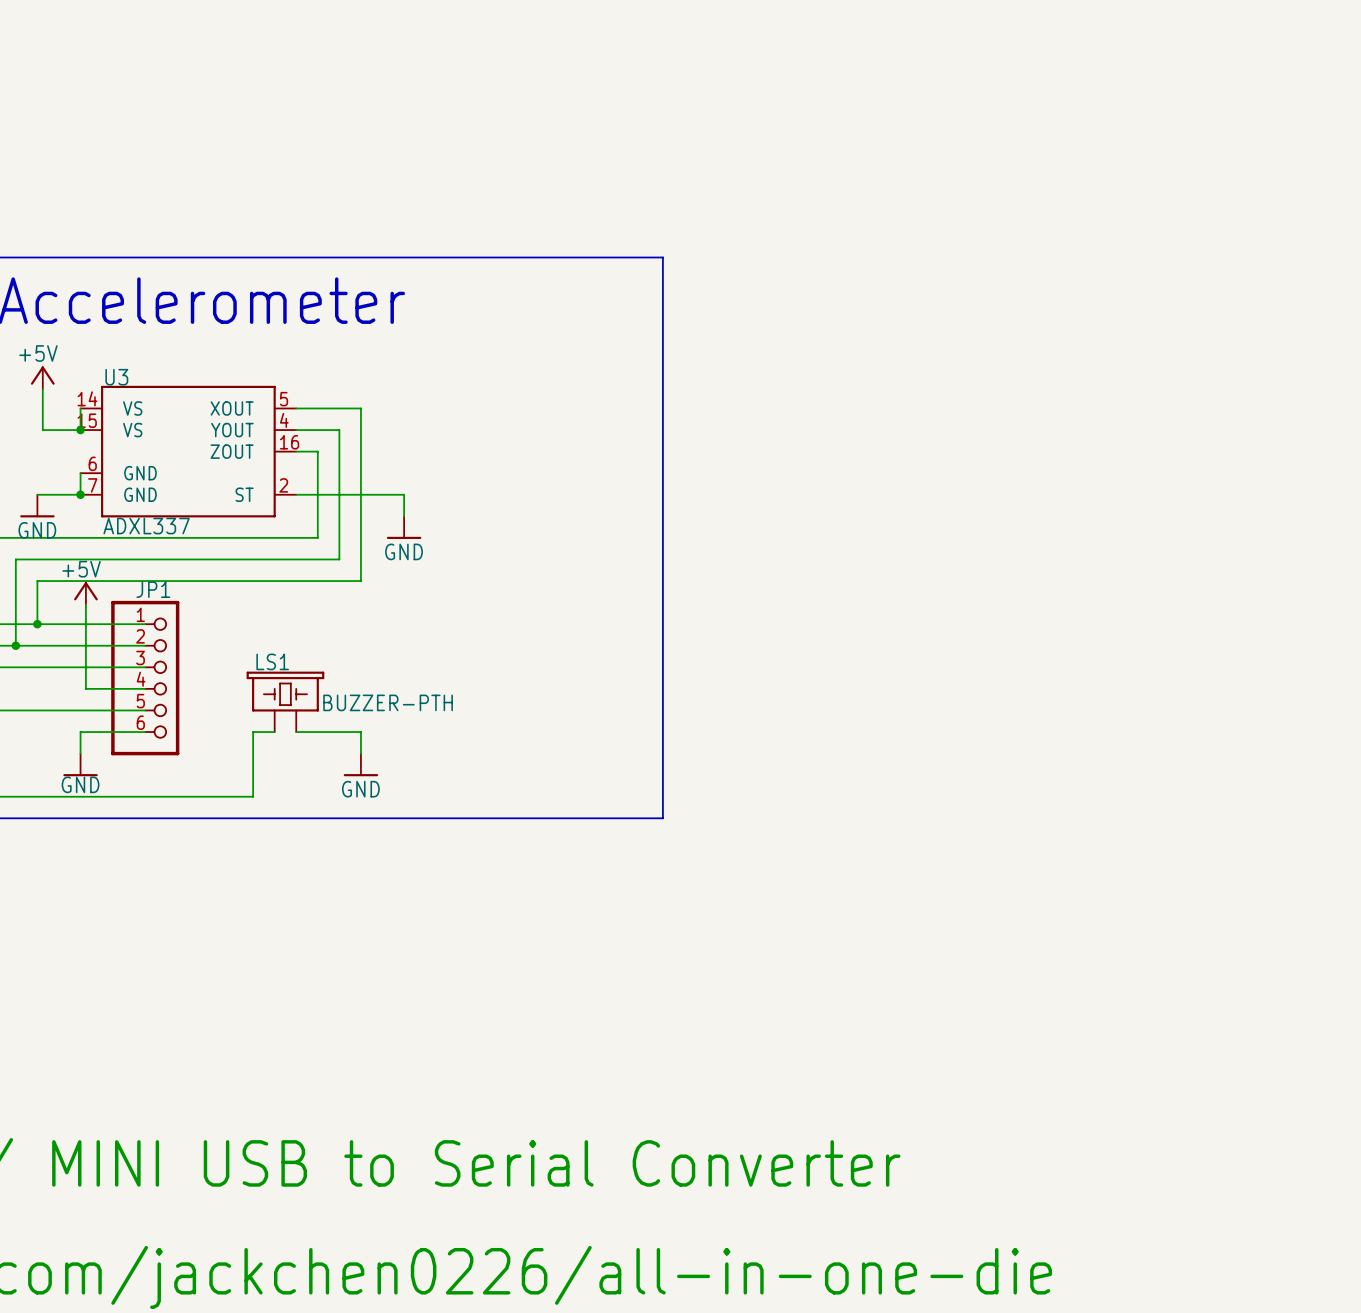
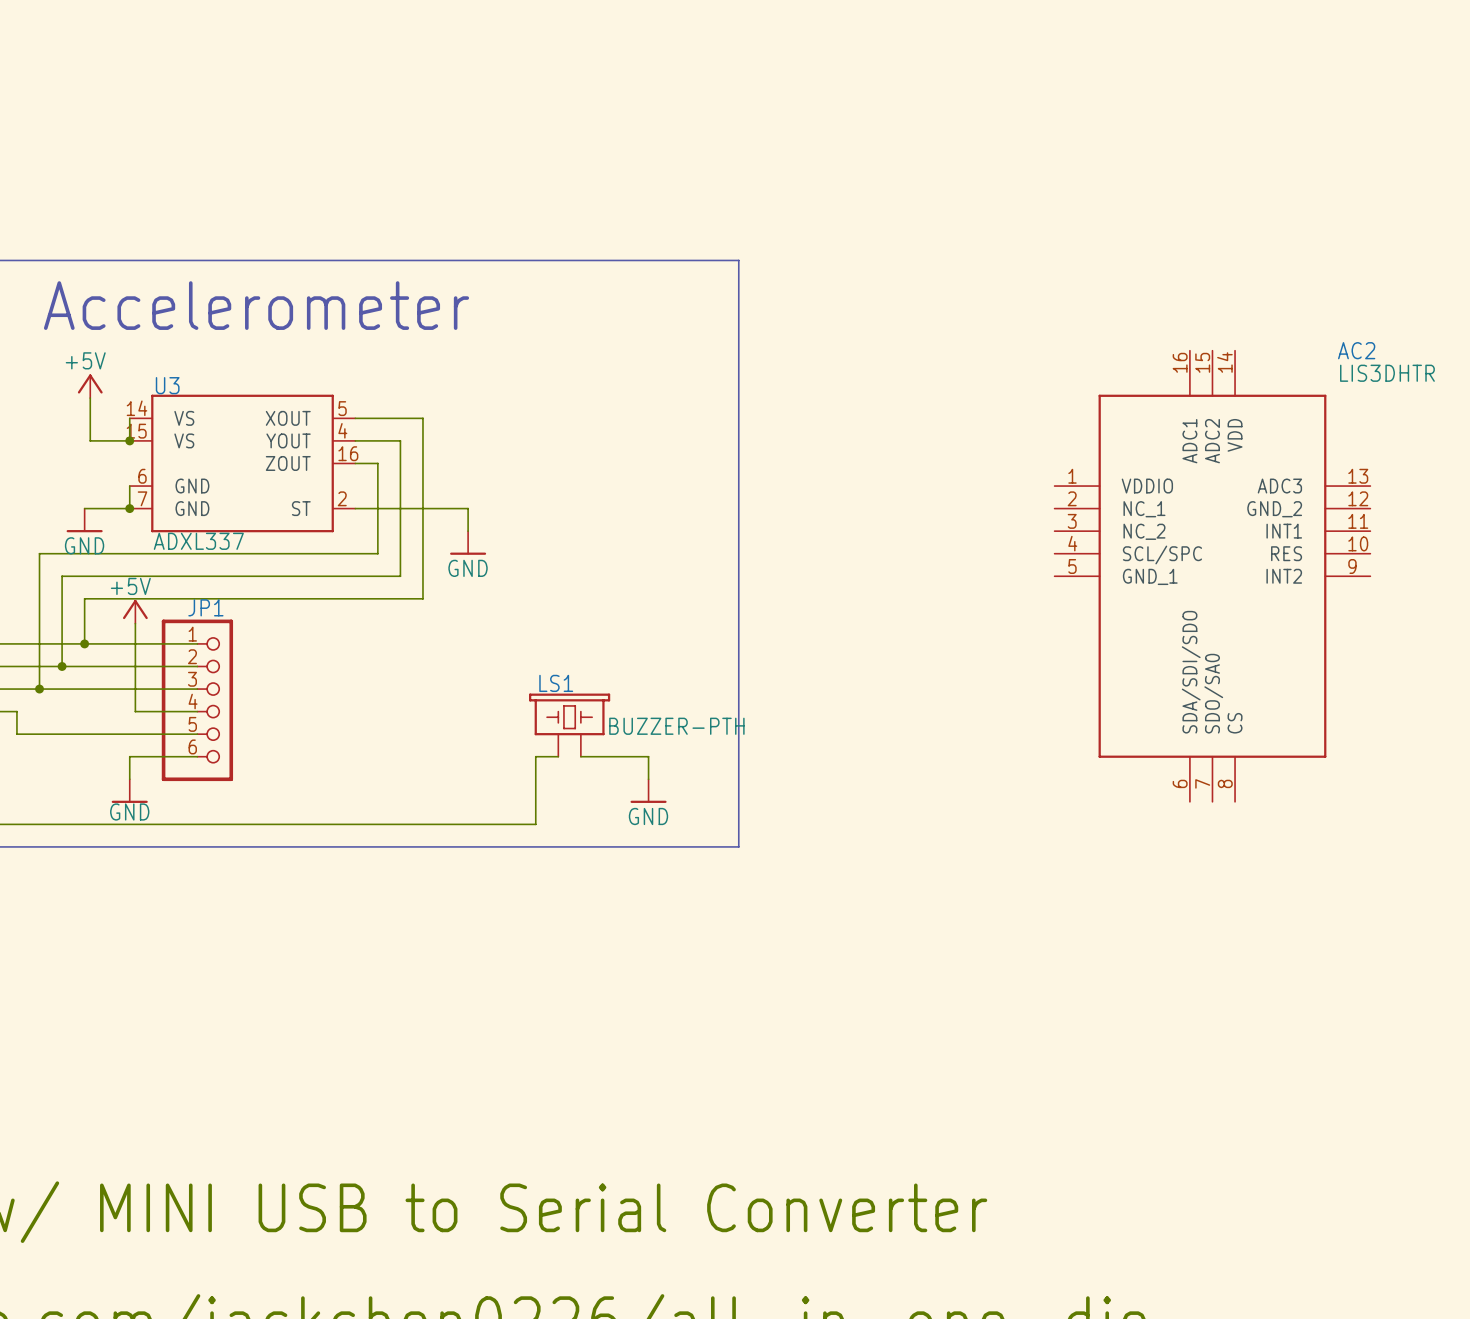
AC2: none -> LIS3DHTR (1212, 576)
LS1 position: (285, 701) -> (569, 725)
wire: (274, 732) (253, 732) (253, 796) -> (558, 756) (535, 756) (535, 824) (310, 824)
wire: (296, 732) (360, 732) (360, 753) -> none
wire: none -> (580, 756) (648, 756) (648, 779)
power symbol: GND (360, 764) -> none
power symbol: none -> GND (648, 791)

